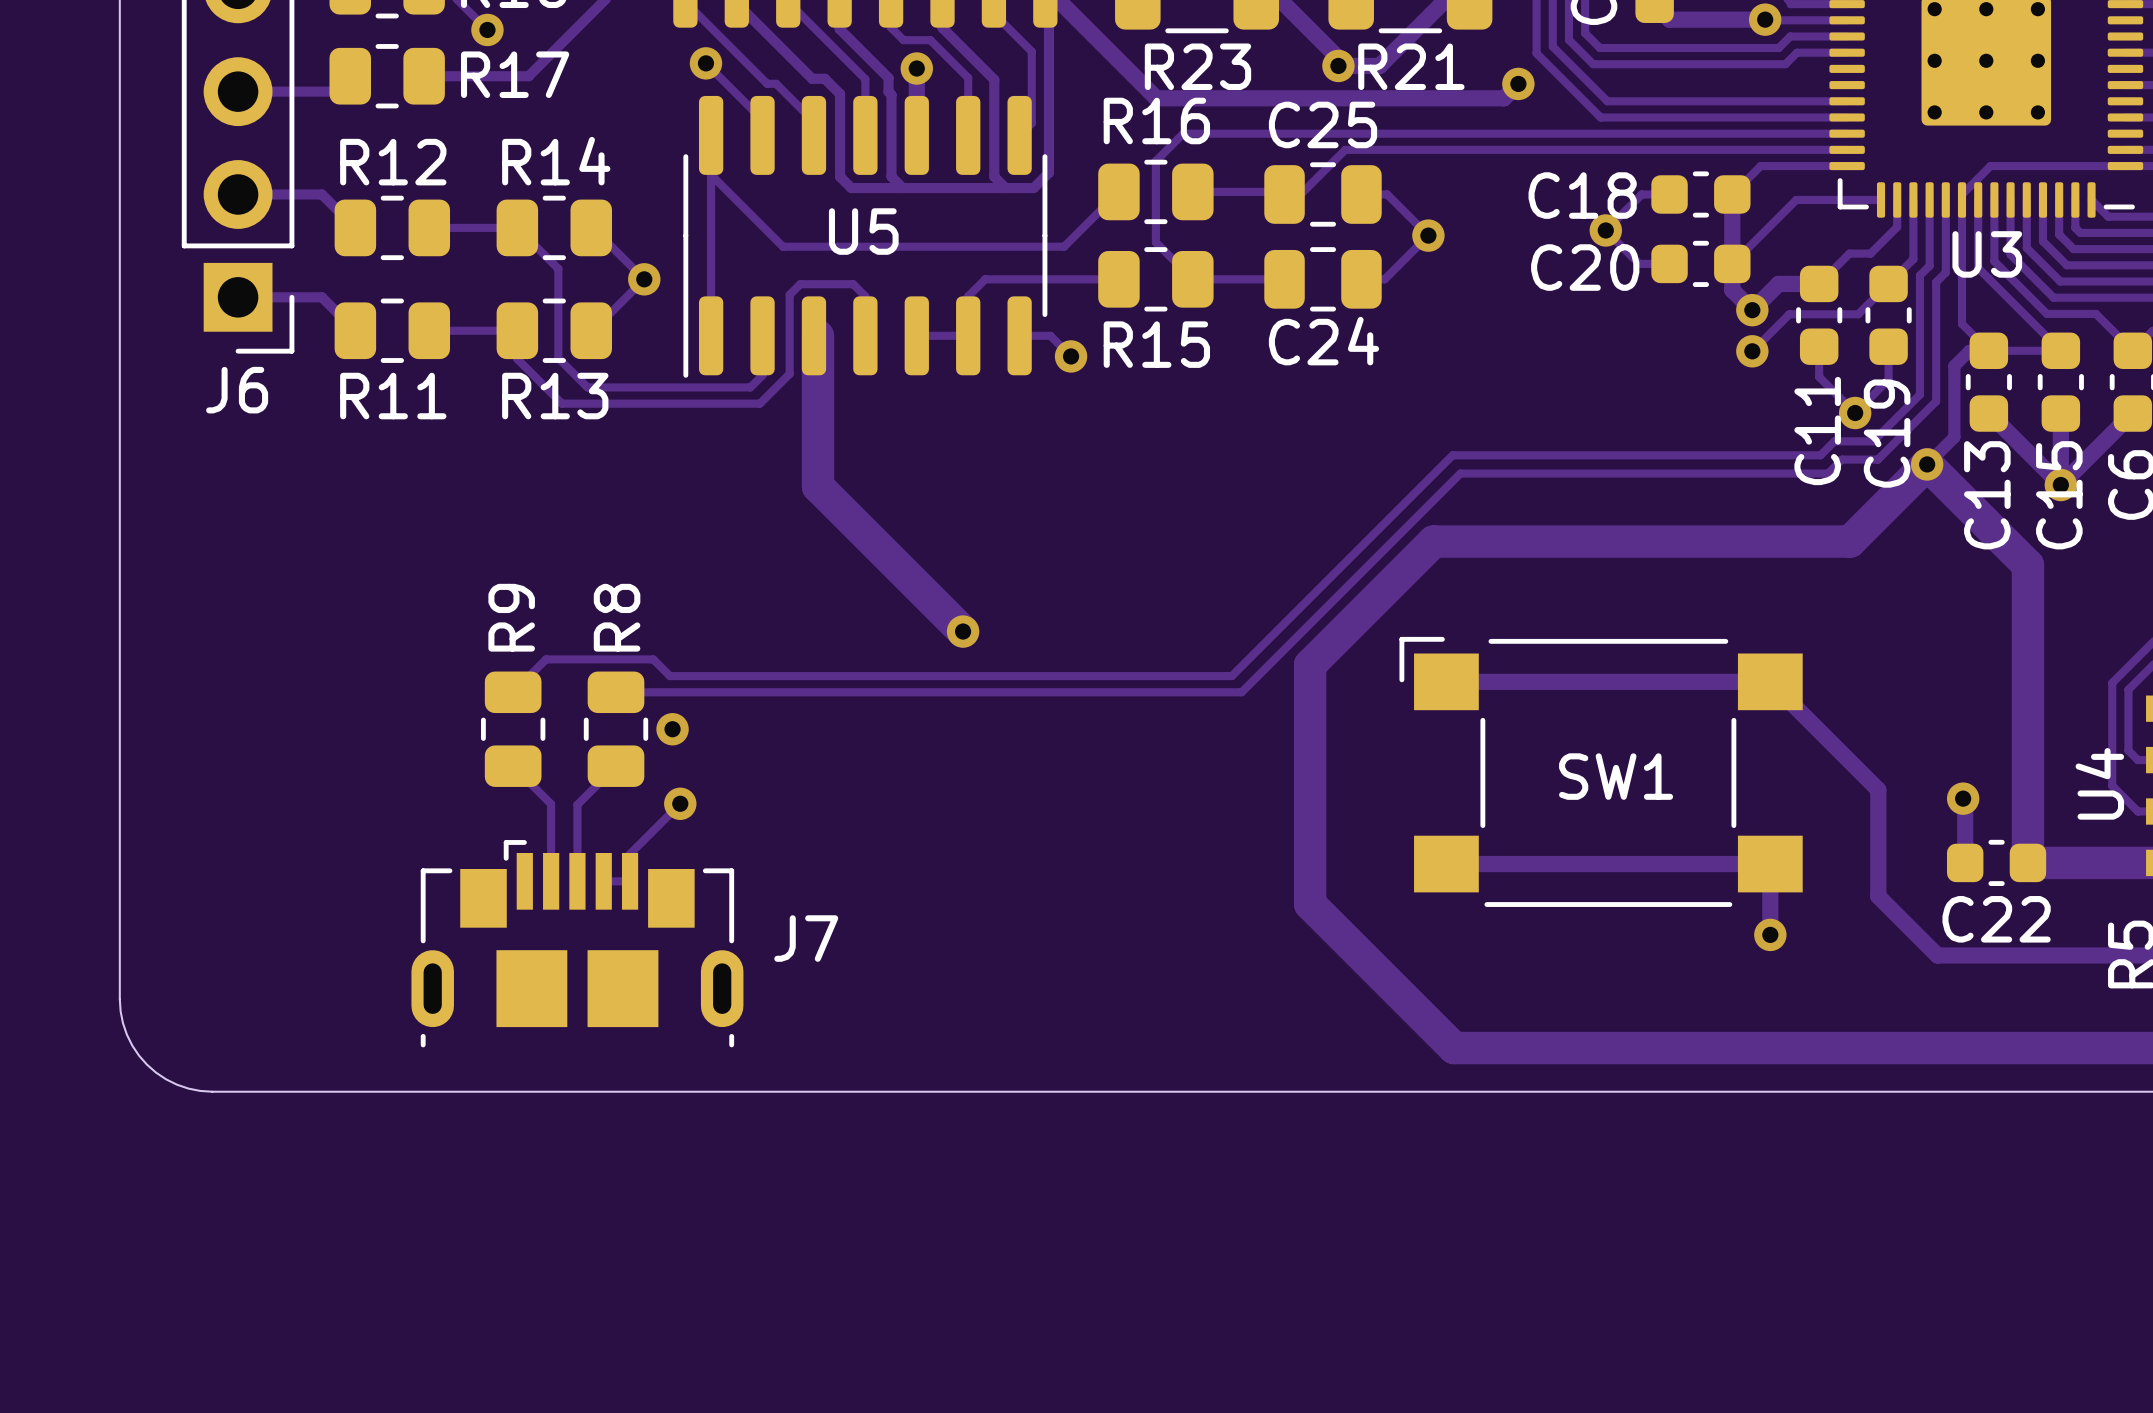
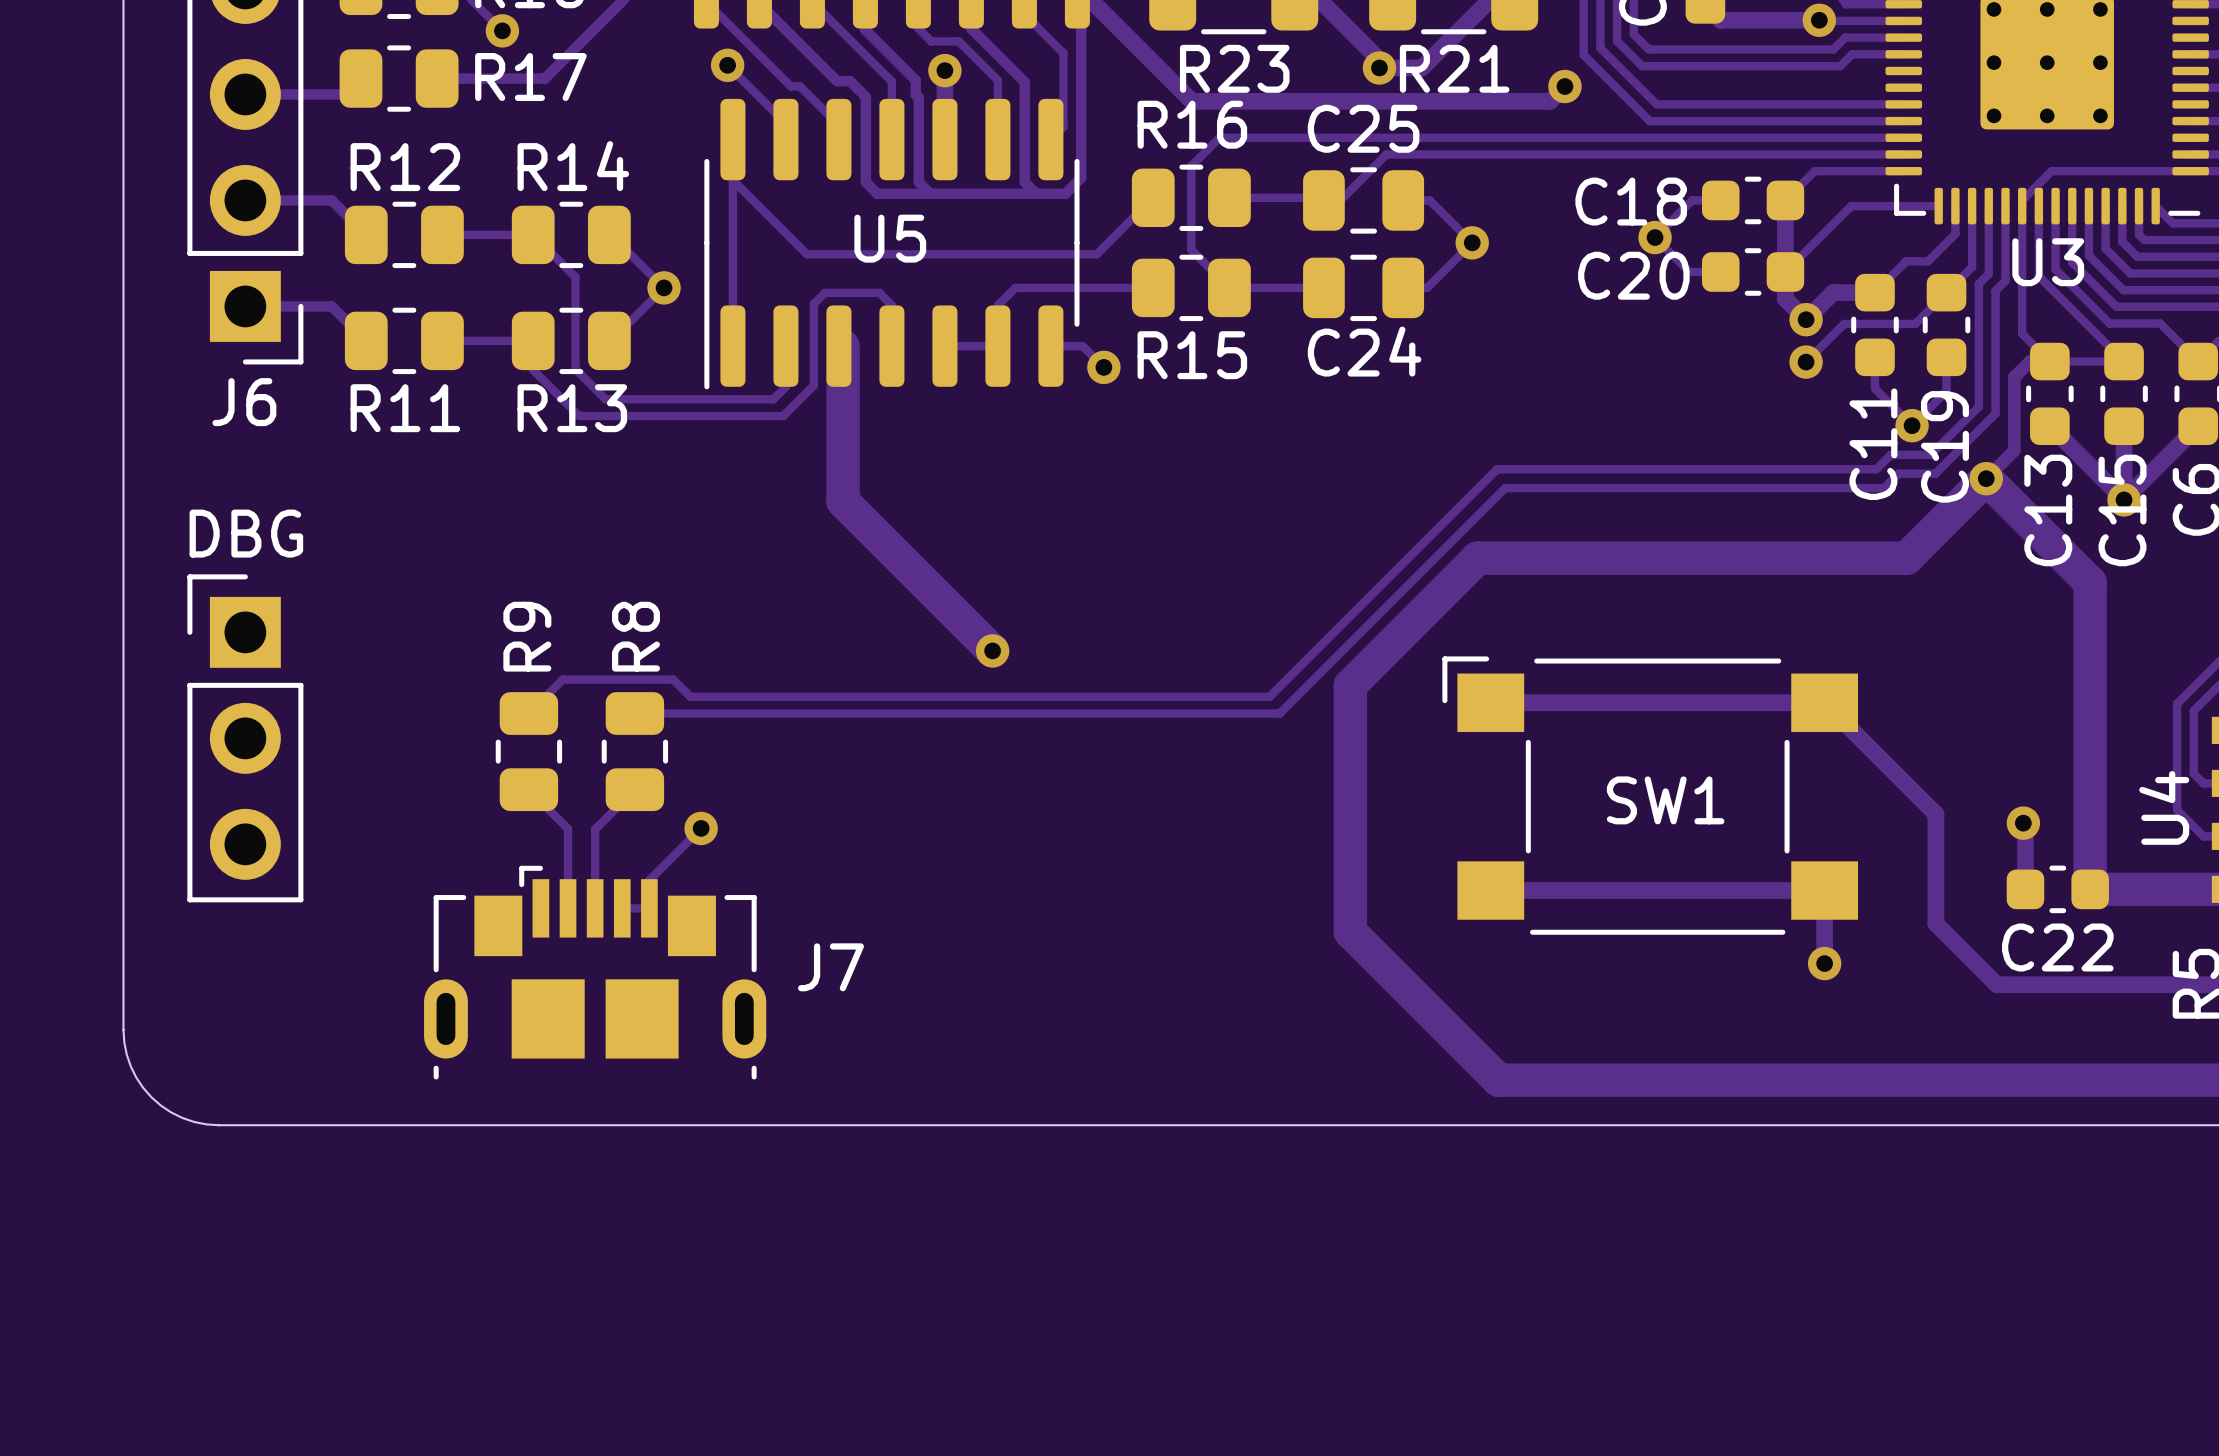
DBG: none -> (245, 738)
via: (672, 729) -> none

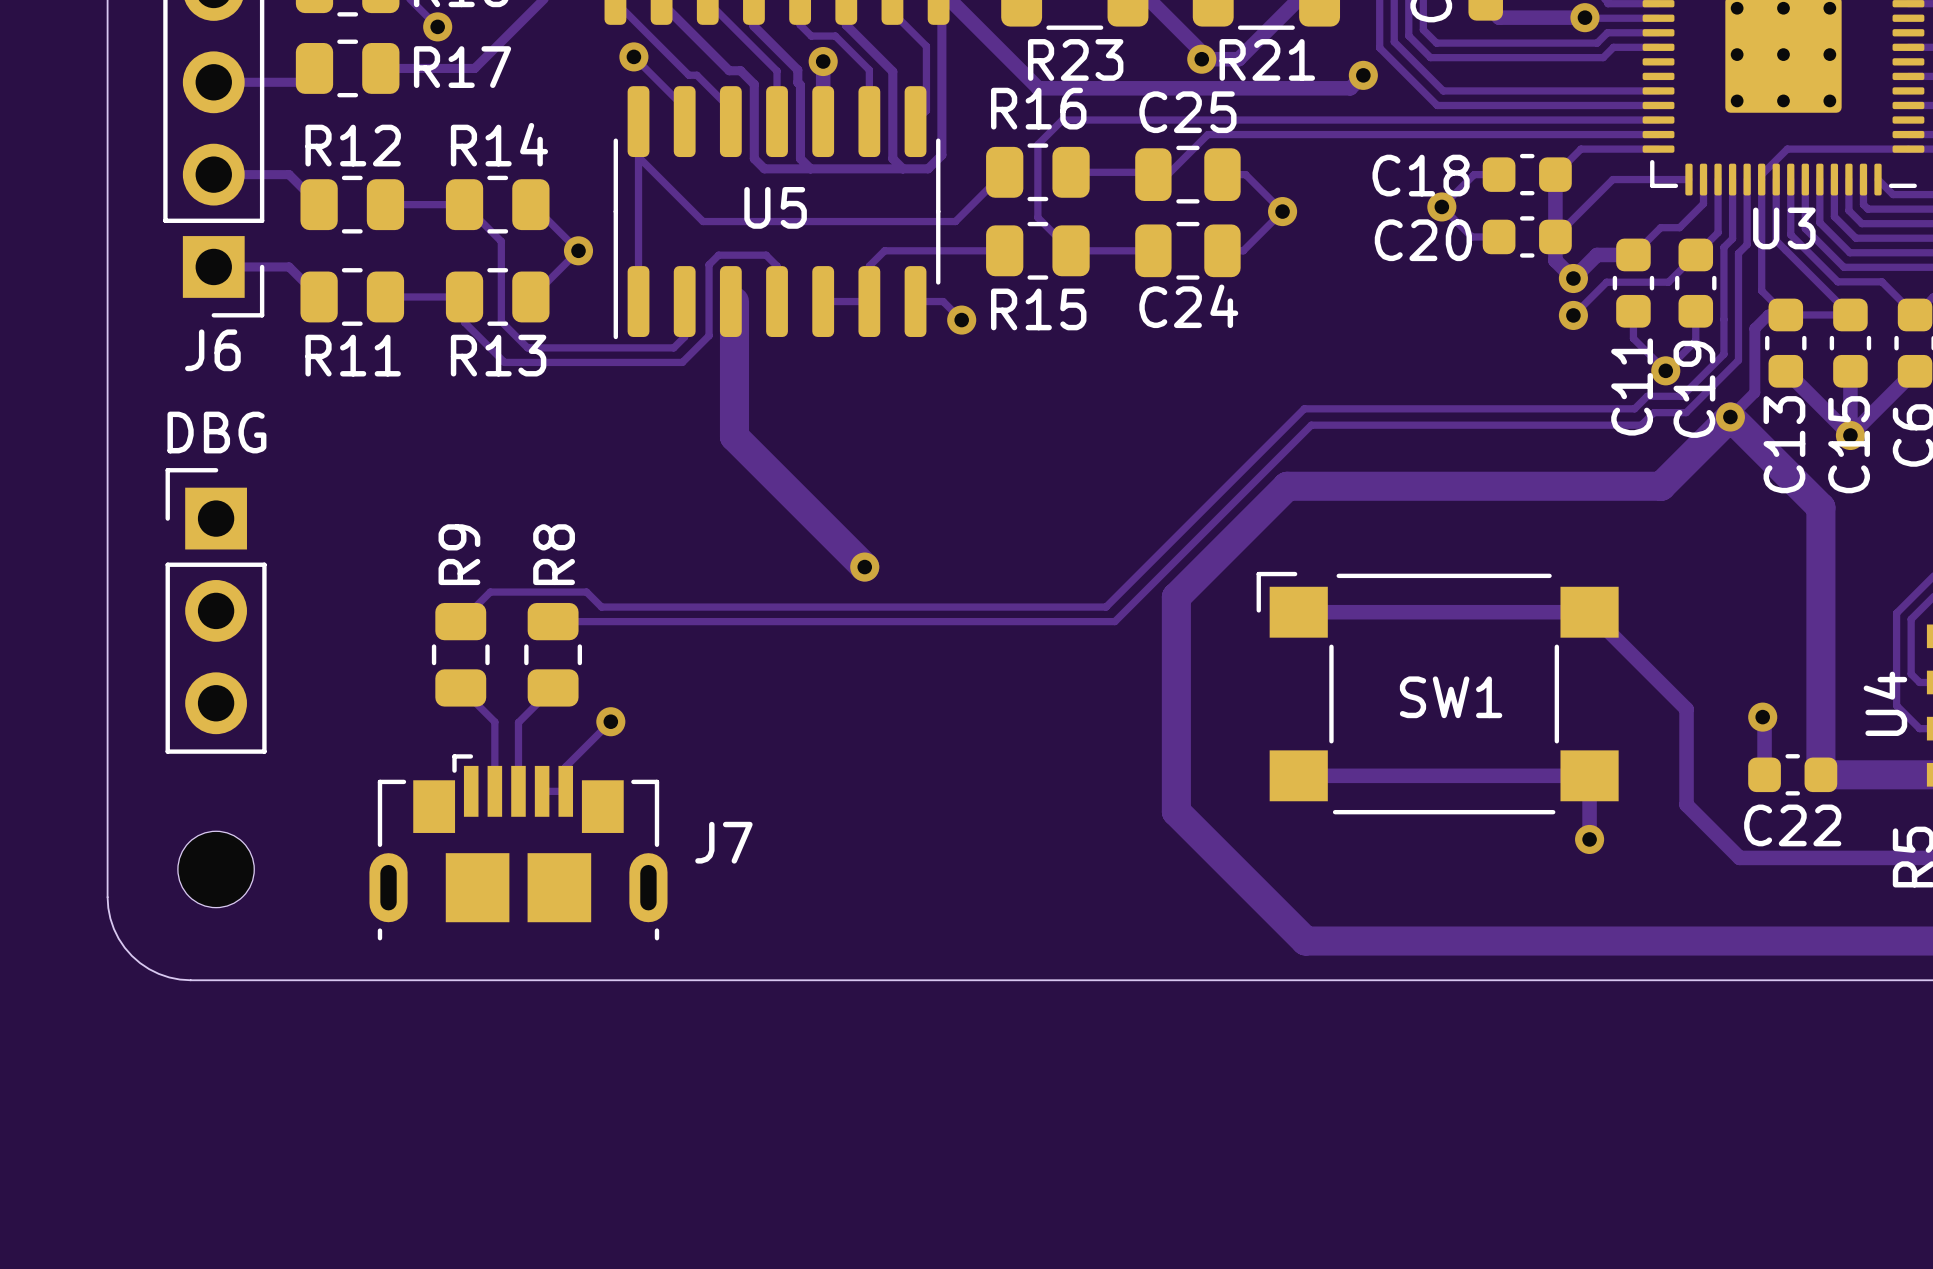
DBG position: (245, 738) -> (216, 610)
part: none -> (216, 869)

